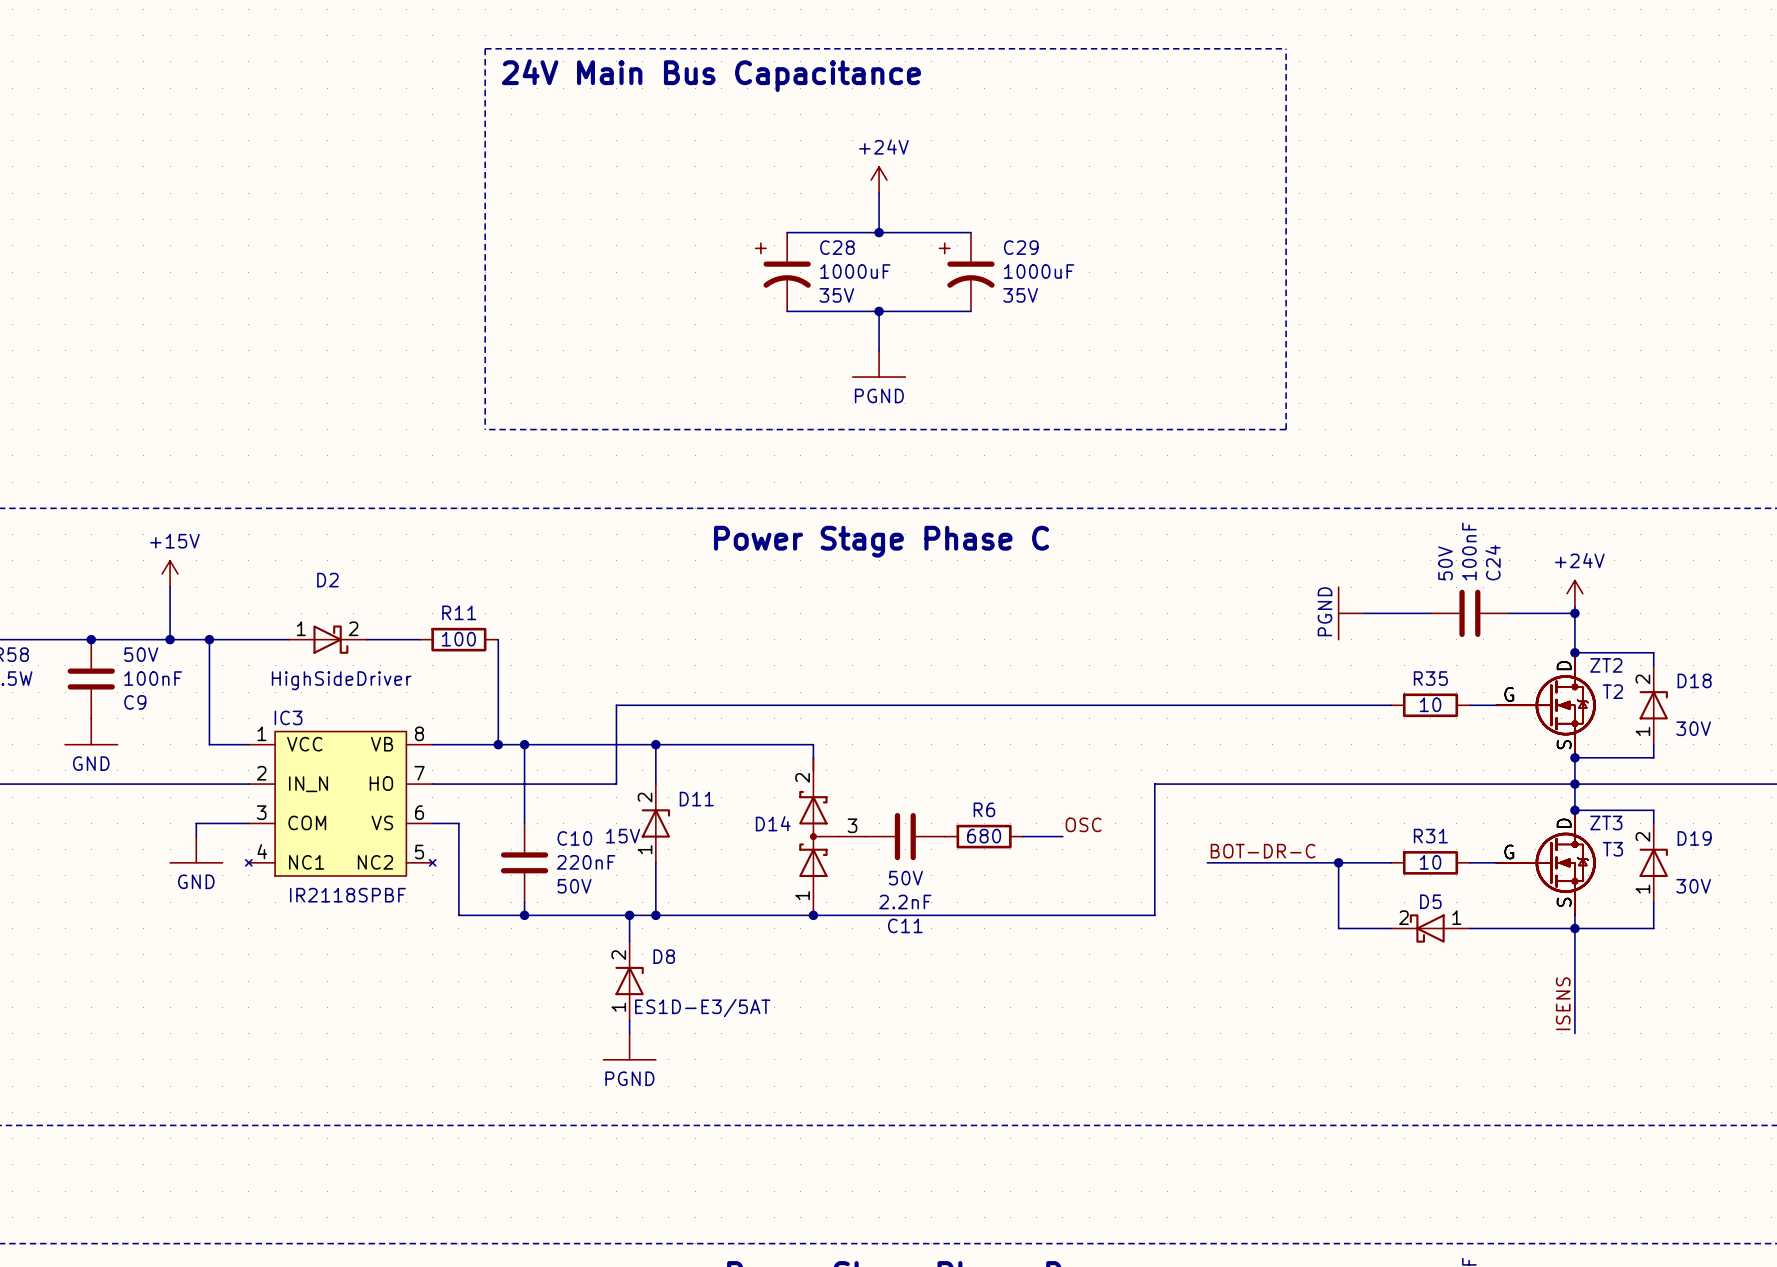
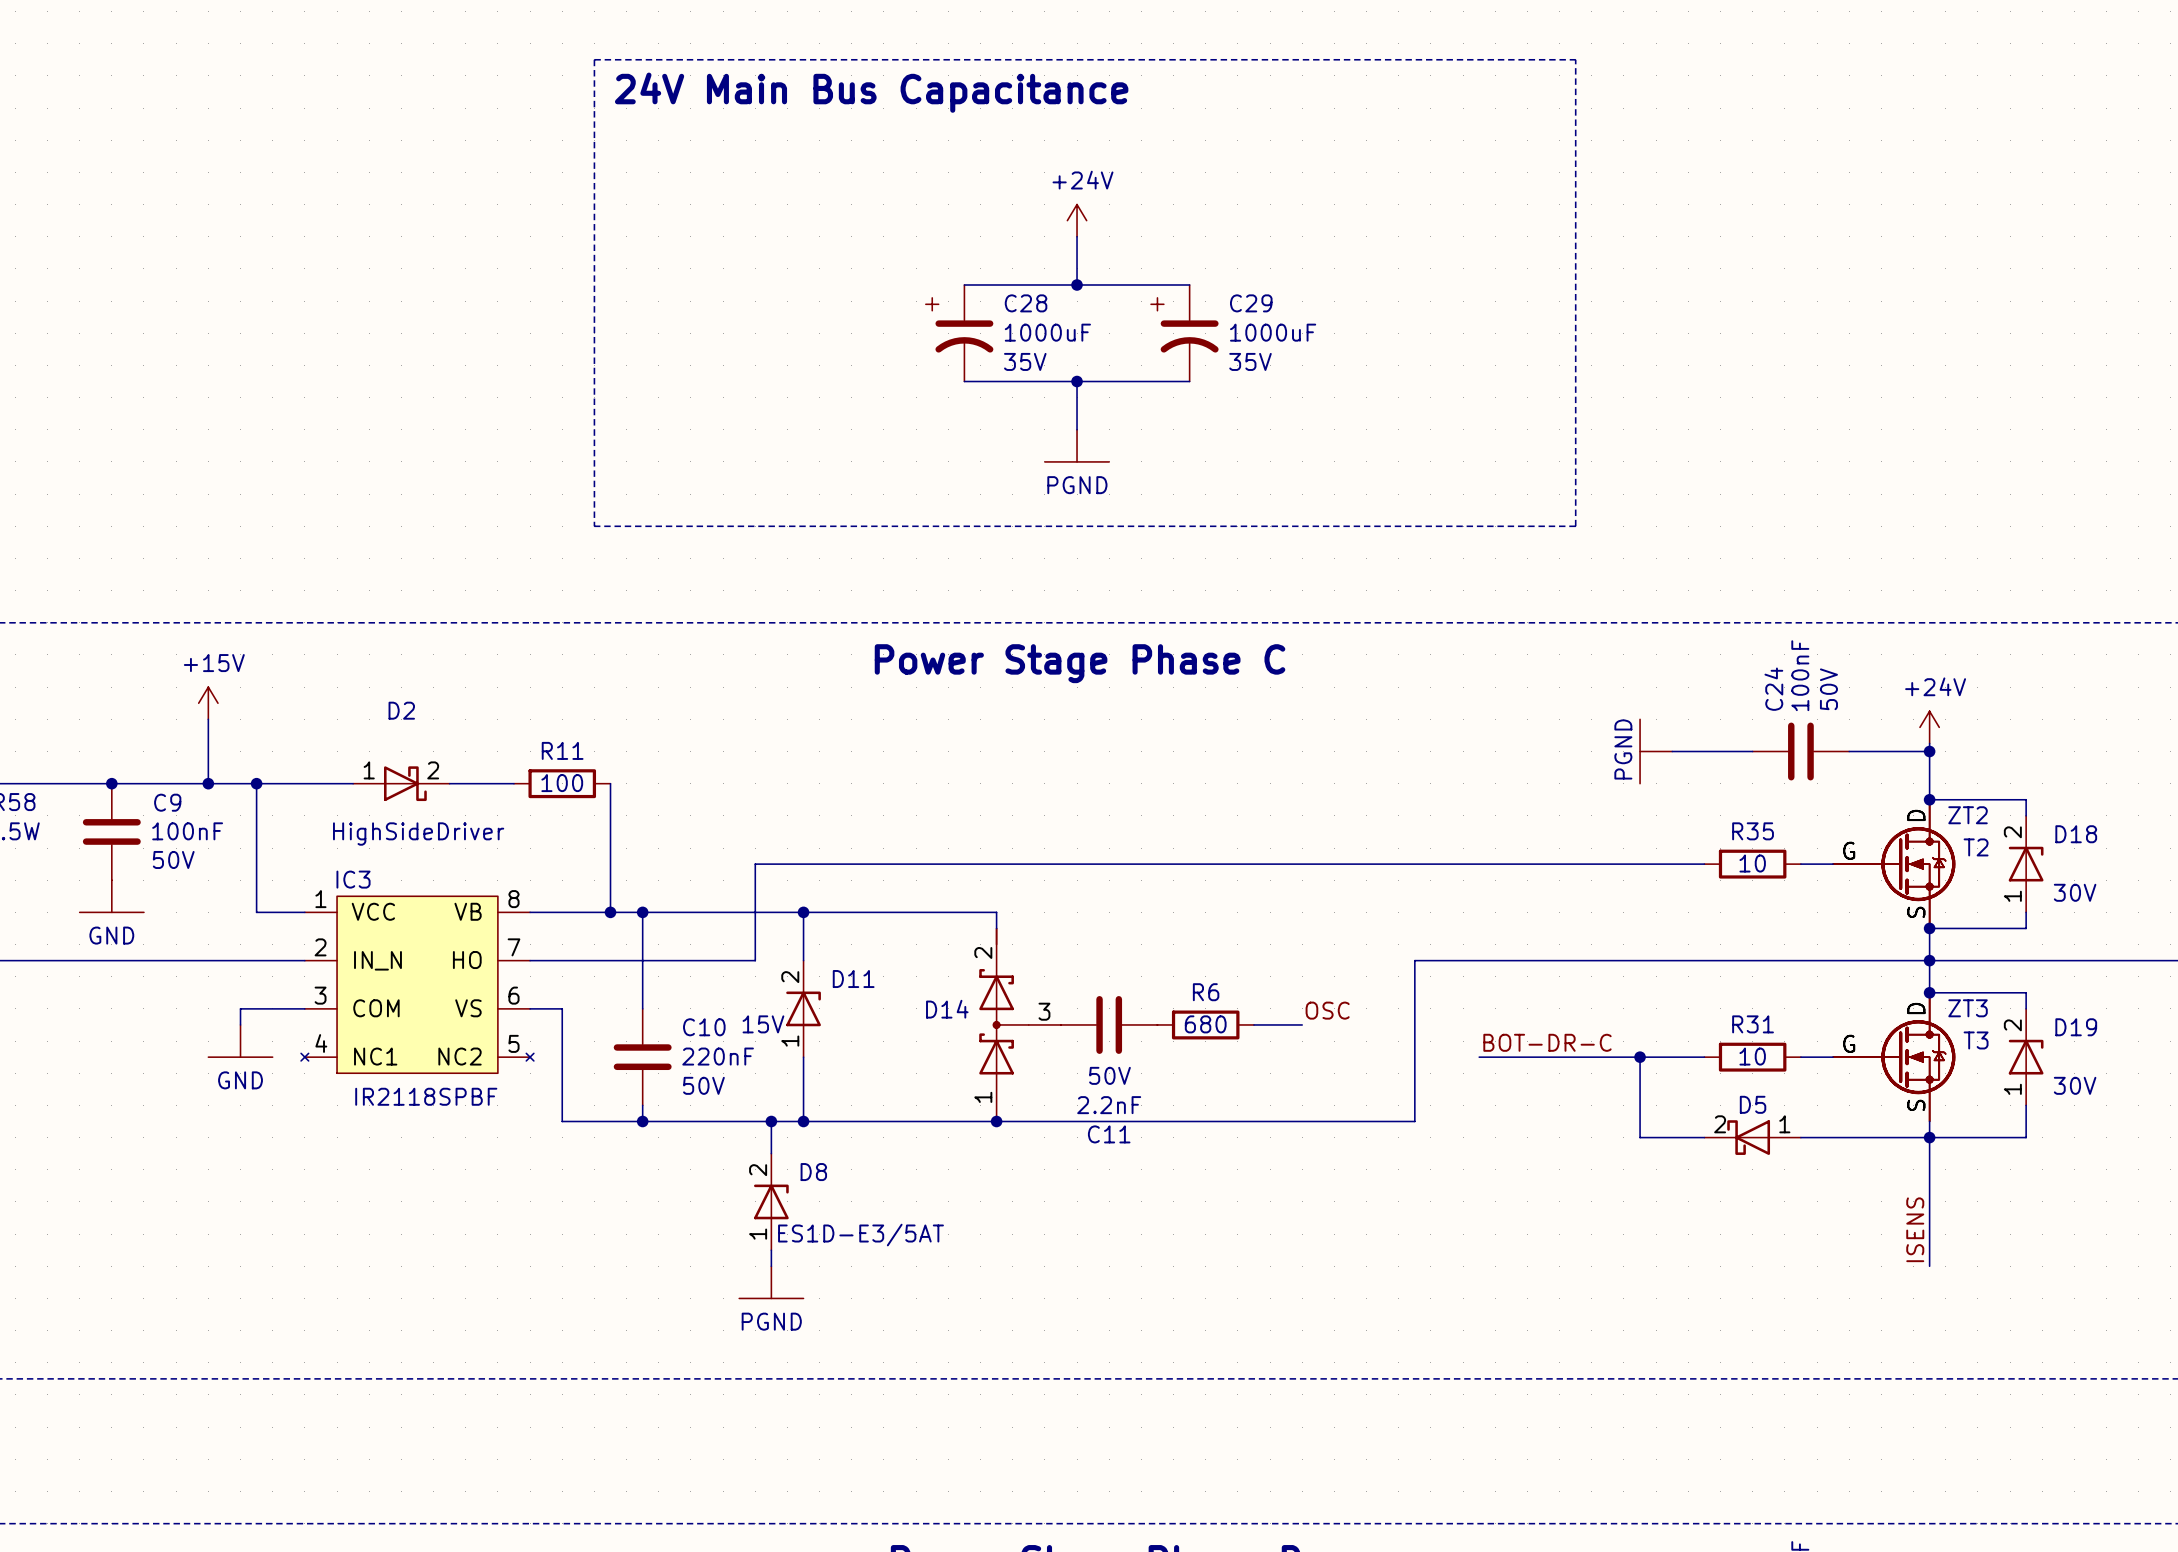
C24 name position: C24 (1493, 562) -> C24 (1773, 689)
C24 text position: 50V (1445, 563) -> 50V (1828, 689)
C9 text position: 50V (141, 654) -> 50V (173, 859)
C9 name position: C9 (135, 702) -> C9 (167, 802)

